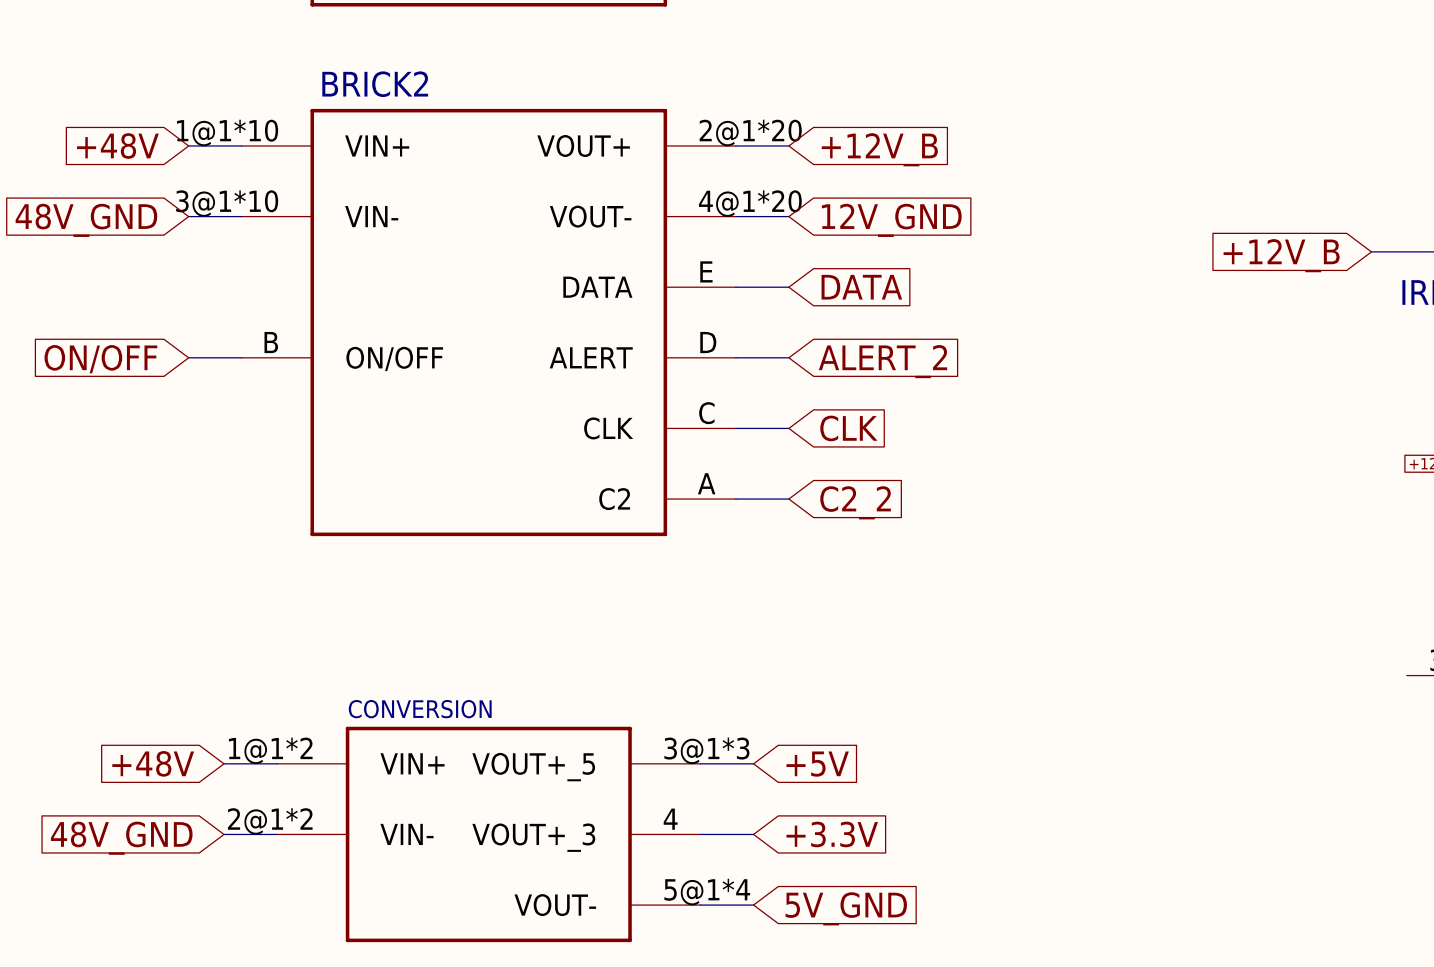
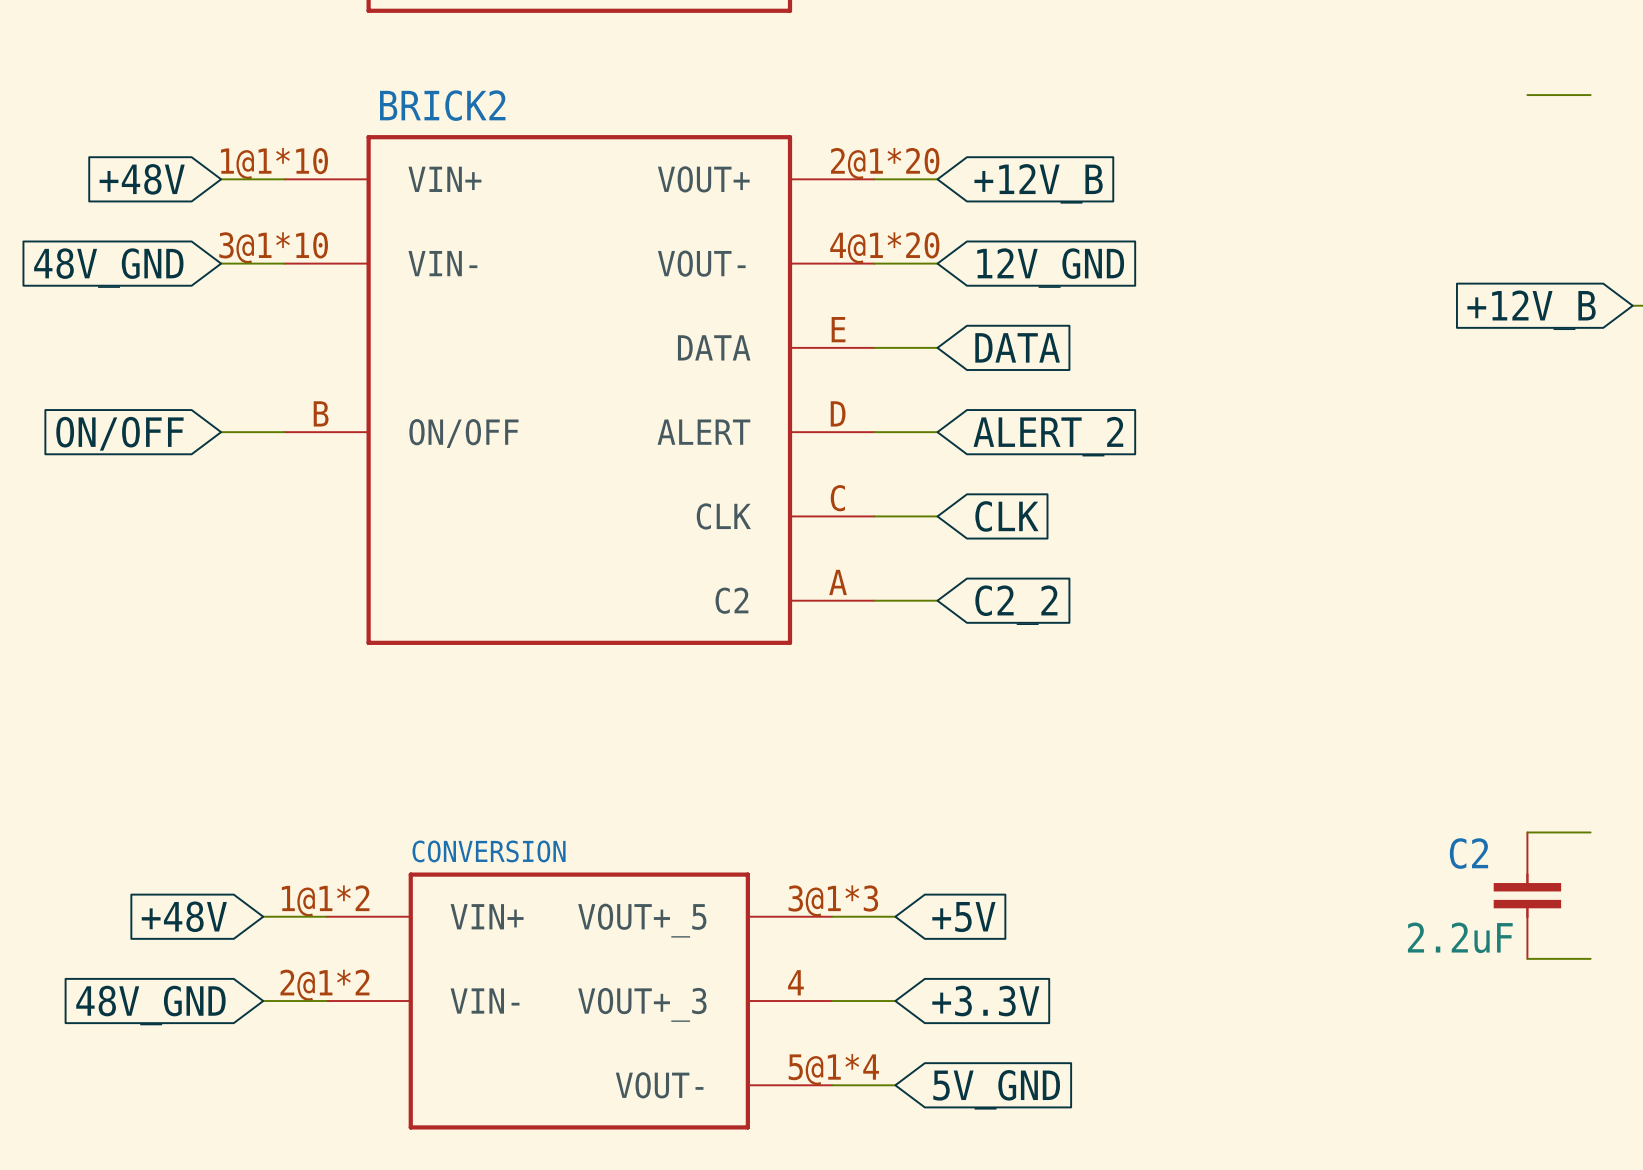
wire: none -> (1527, 95) (1590, 95)
wire: none -> (1527, 832) (1590, 832)
C2: none -> 2.2uF (1527, 895)
wire: none -> (1527, 958) (1590, 958)

